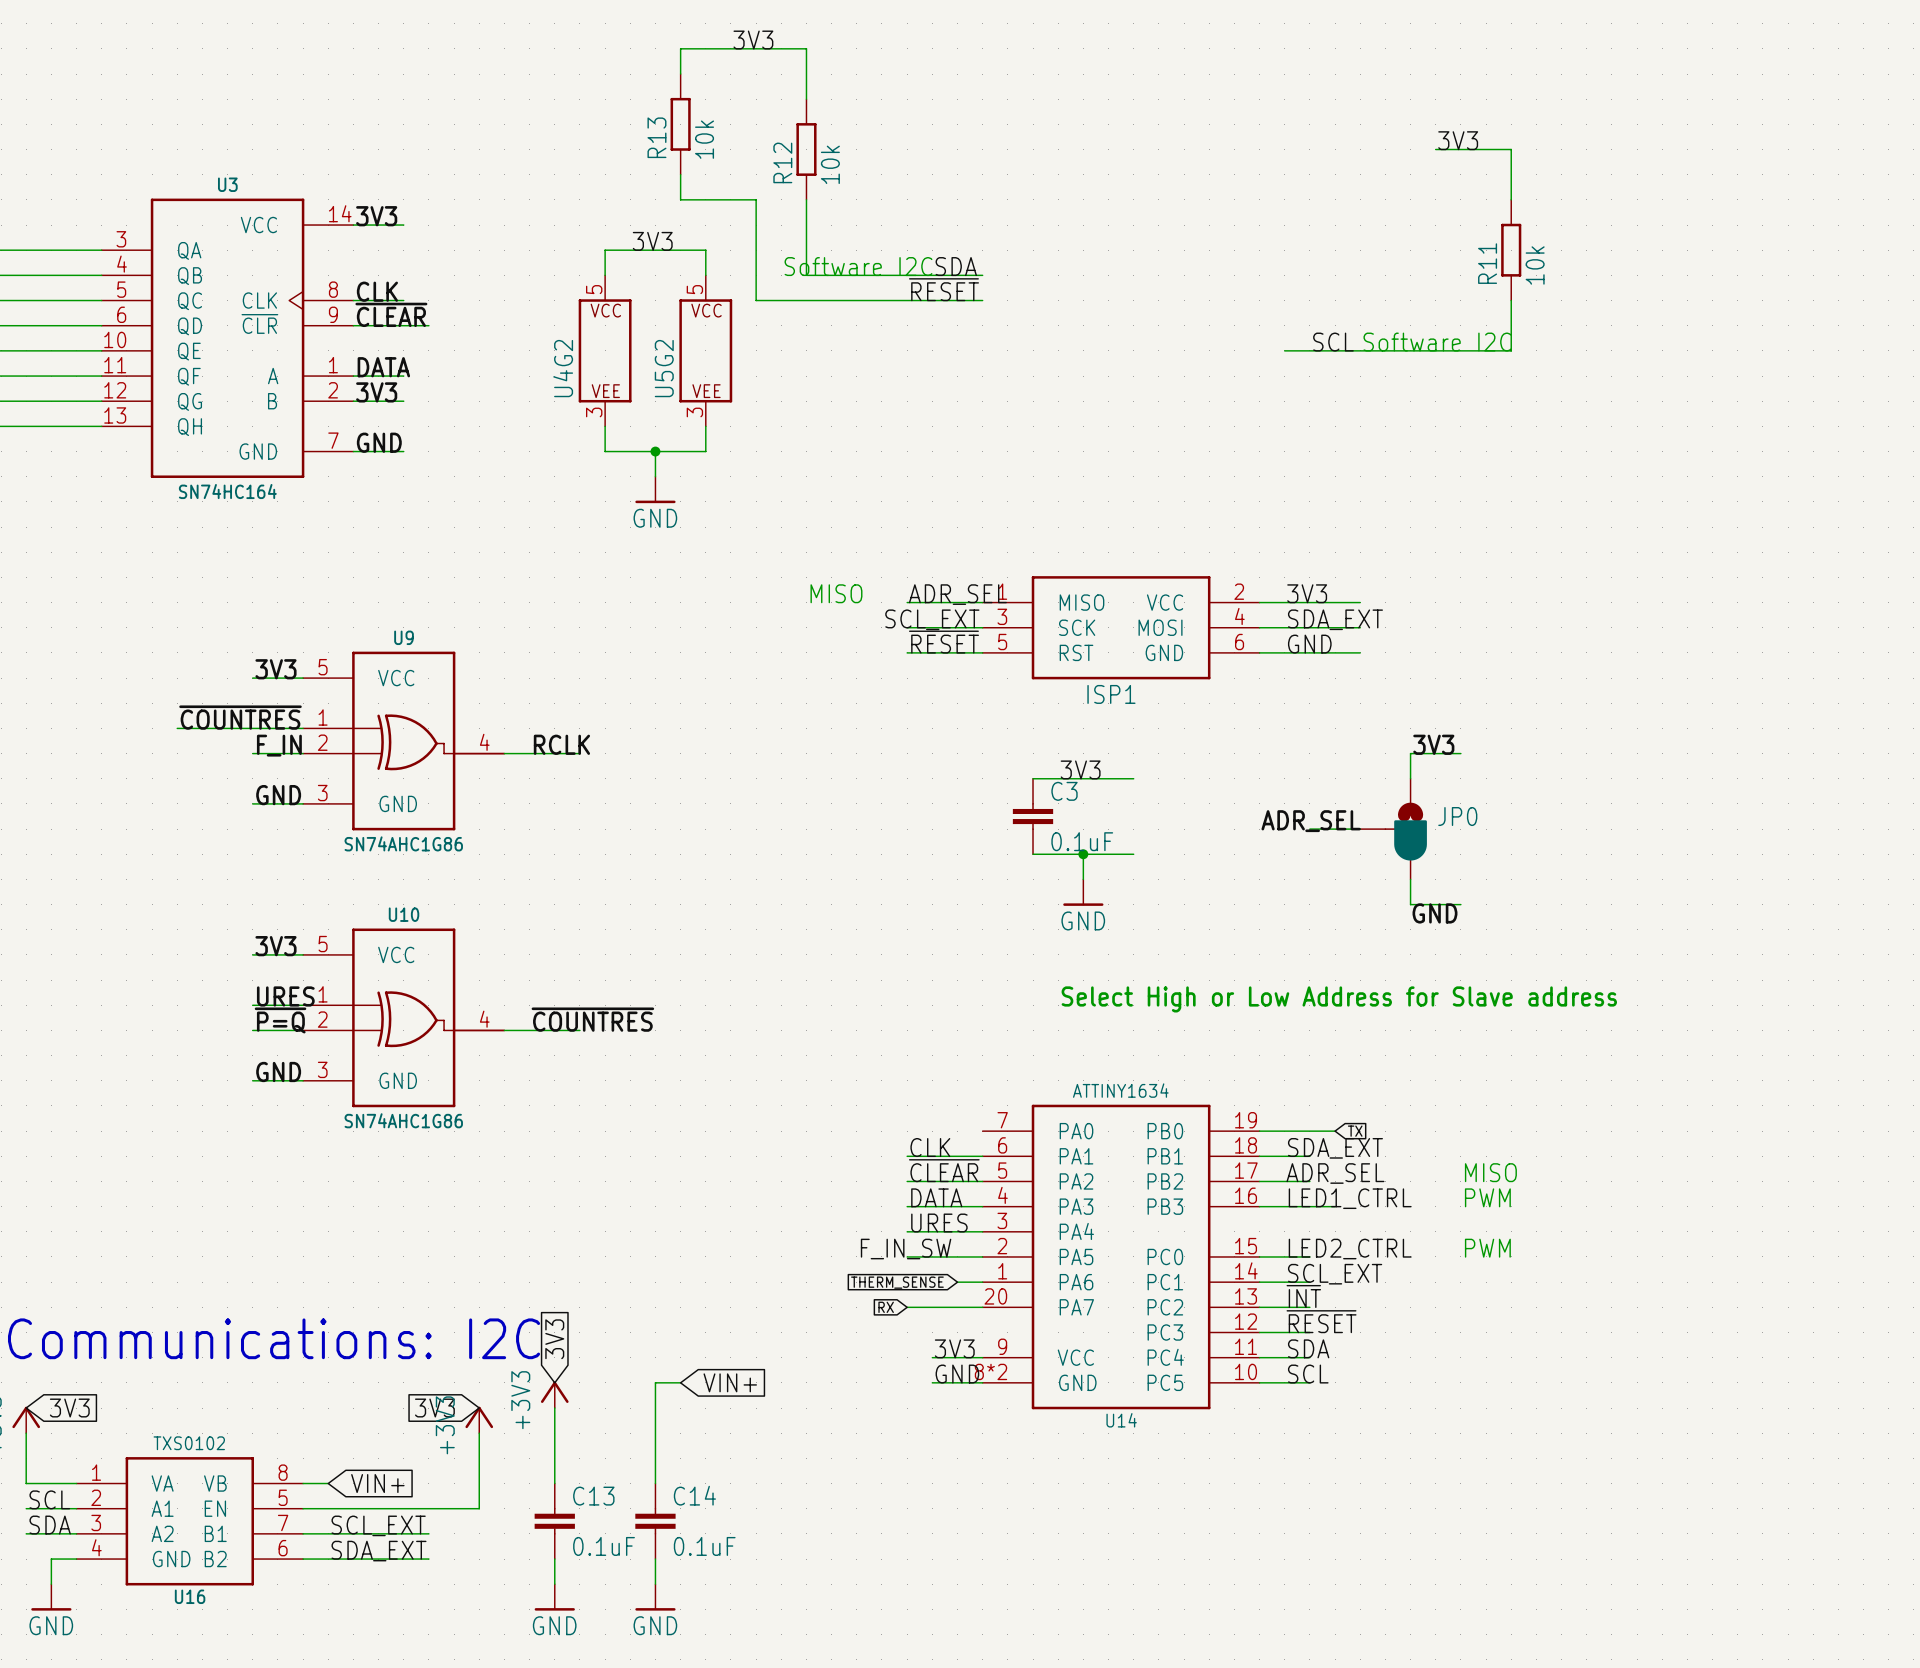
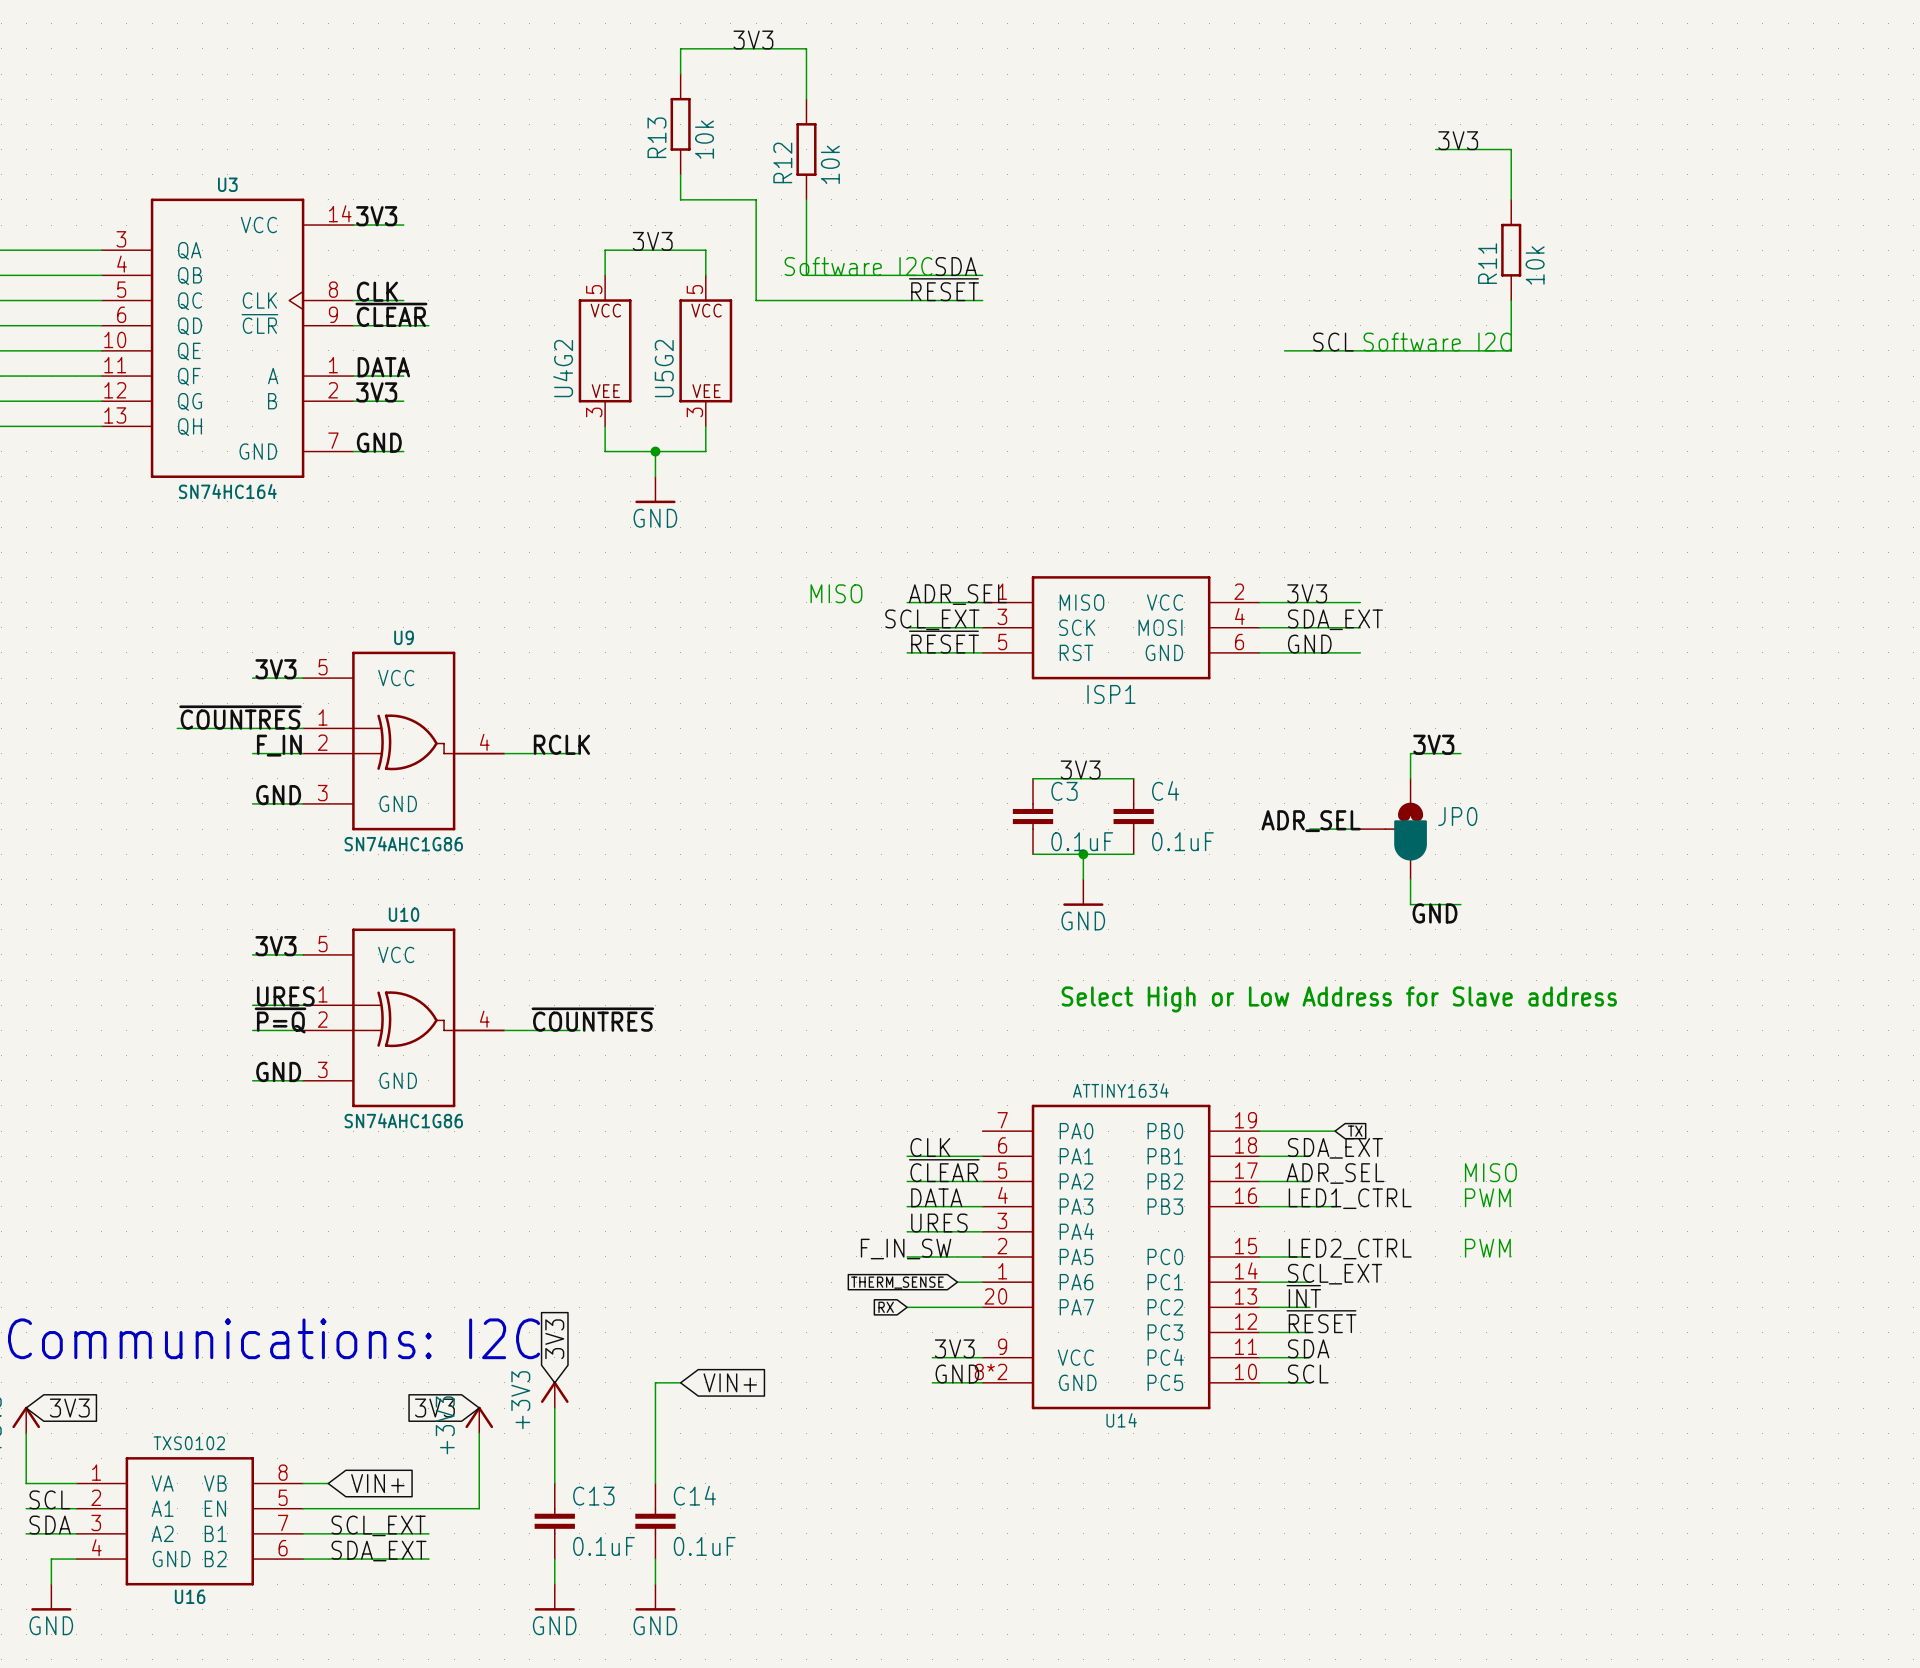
C4: none -> 0.1uF (1133, 816)

